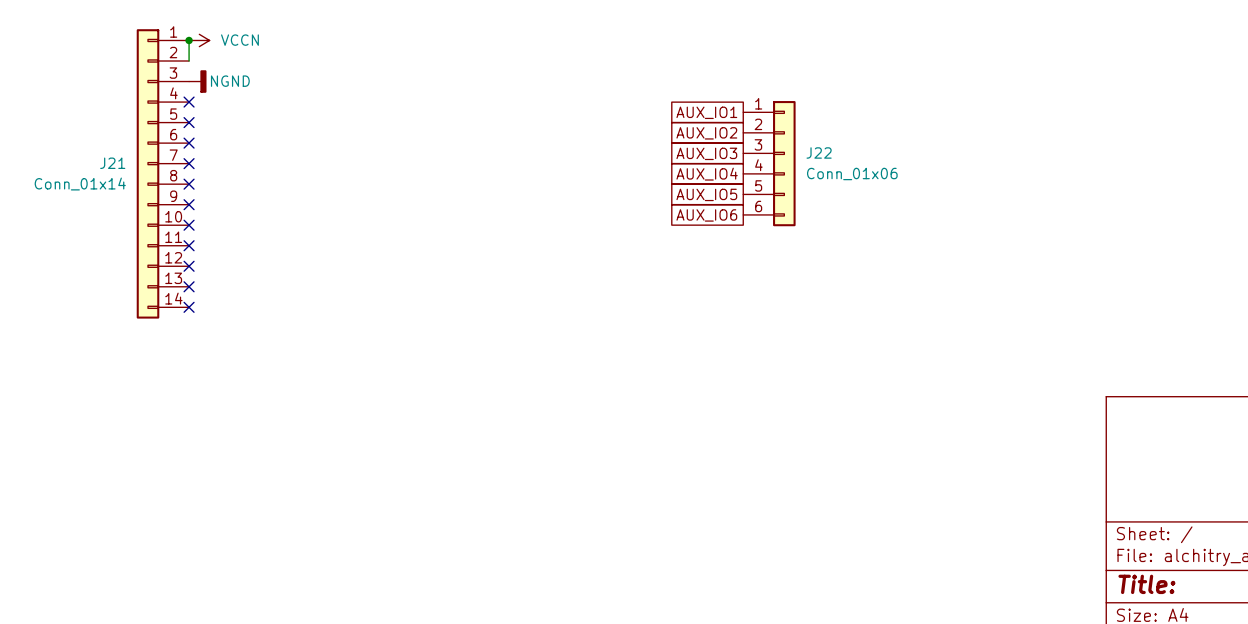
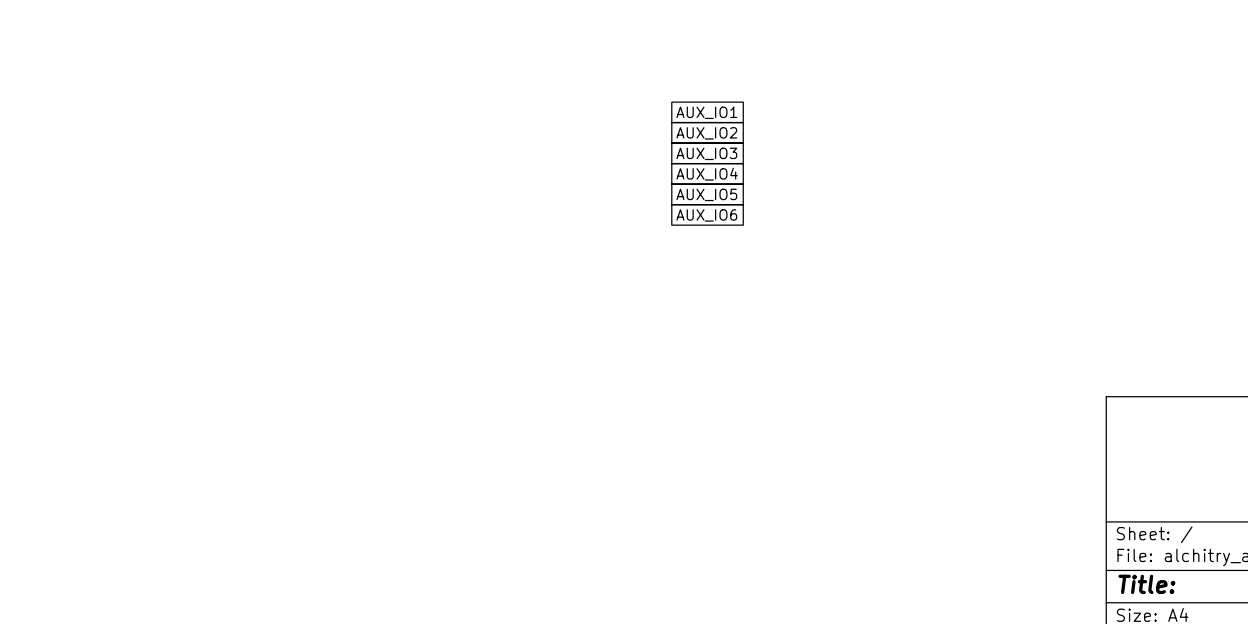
wire: (189, 40) (189, 61) -> none
junction: (189, 40) -> none
power symbol: VCCN (199, 40) -> none
power symbol: NGND (197, 81) -> none
no-connect mark: (189, 102) -> none
no-connect mark: (189, 122) -> none
no-connect mark: (189, 143) -> none
no-connect mark: (189, 163) -> none
J22: Conn_01x06 (769, 163) -> none
J21: Conn_01x14 (162, 173) -> none
no-connect mark: (189, 184) -> none
no-connect mark: (189, 204) -> none
no-connect mark: (189, 225) -> none
no-connect mark: (189, 245) -> none
no-connect mark: (189, 266) -> none
no-connect mark: (189, 286) -> none
no-connect mark: (189, 307) -> none

